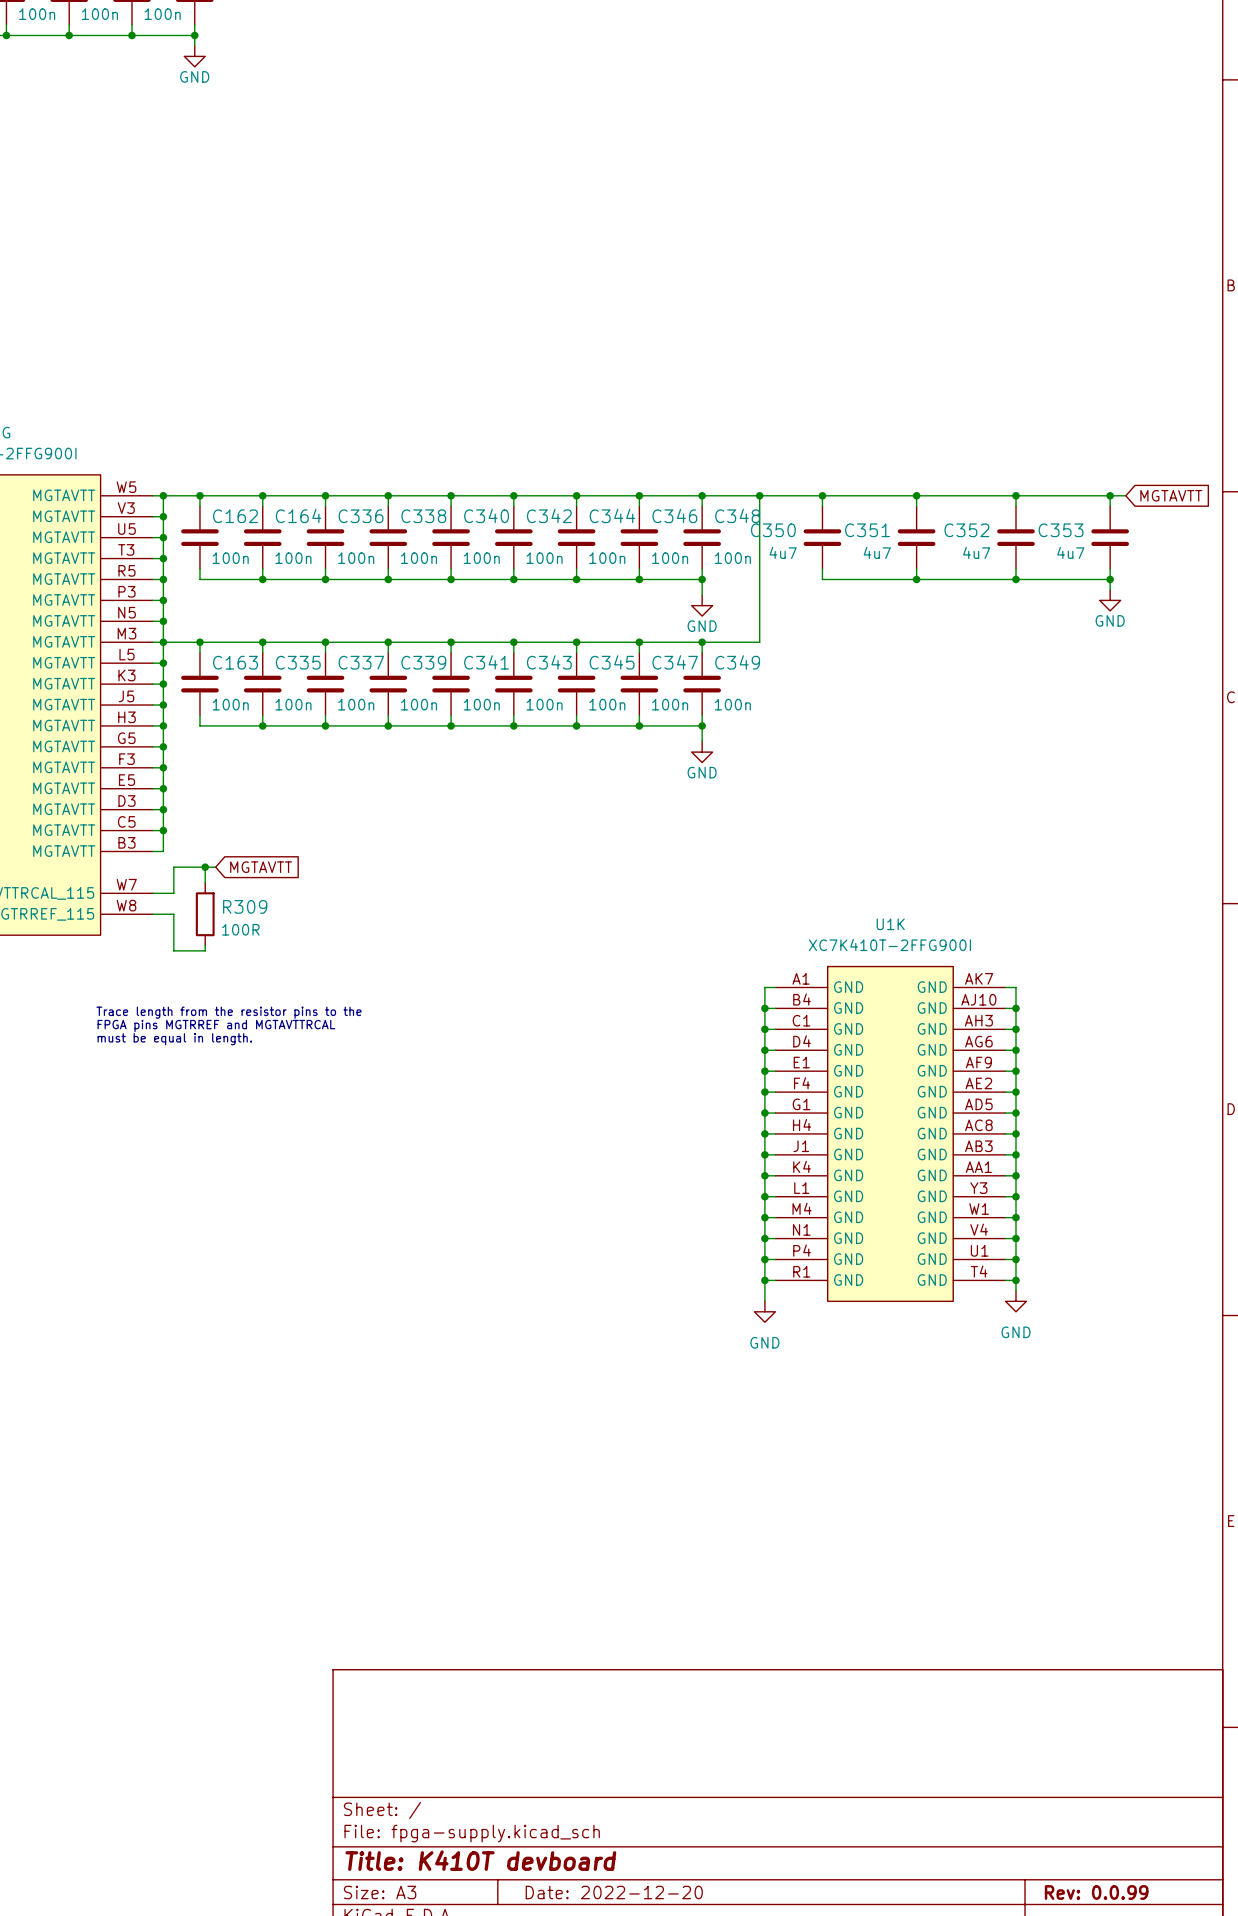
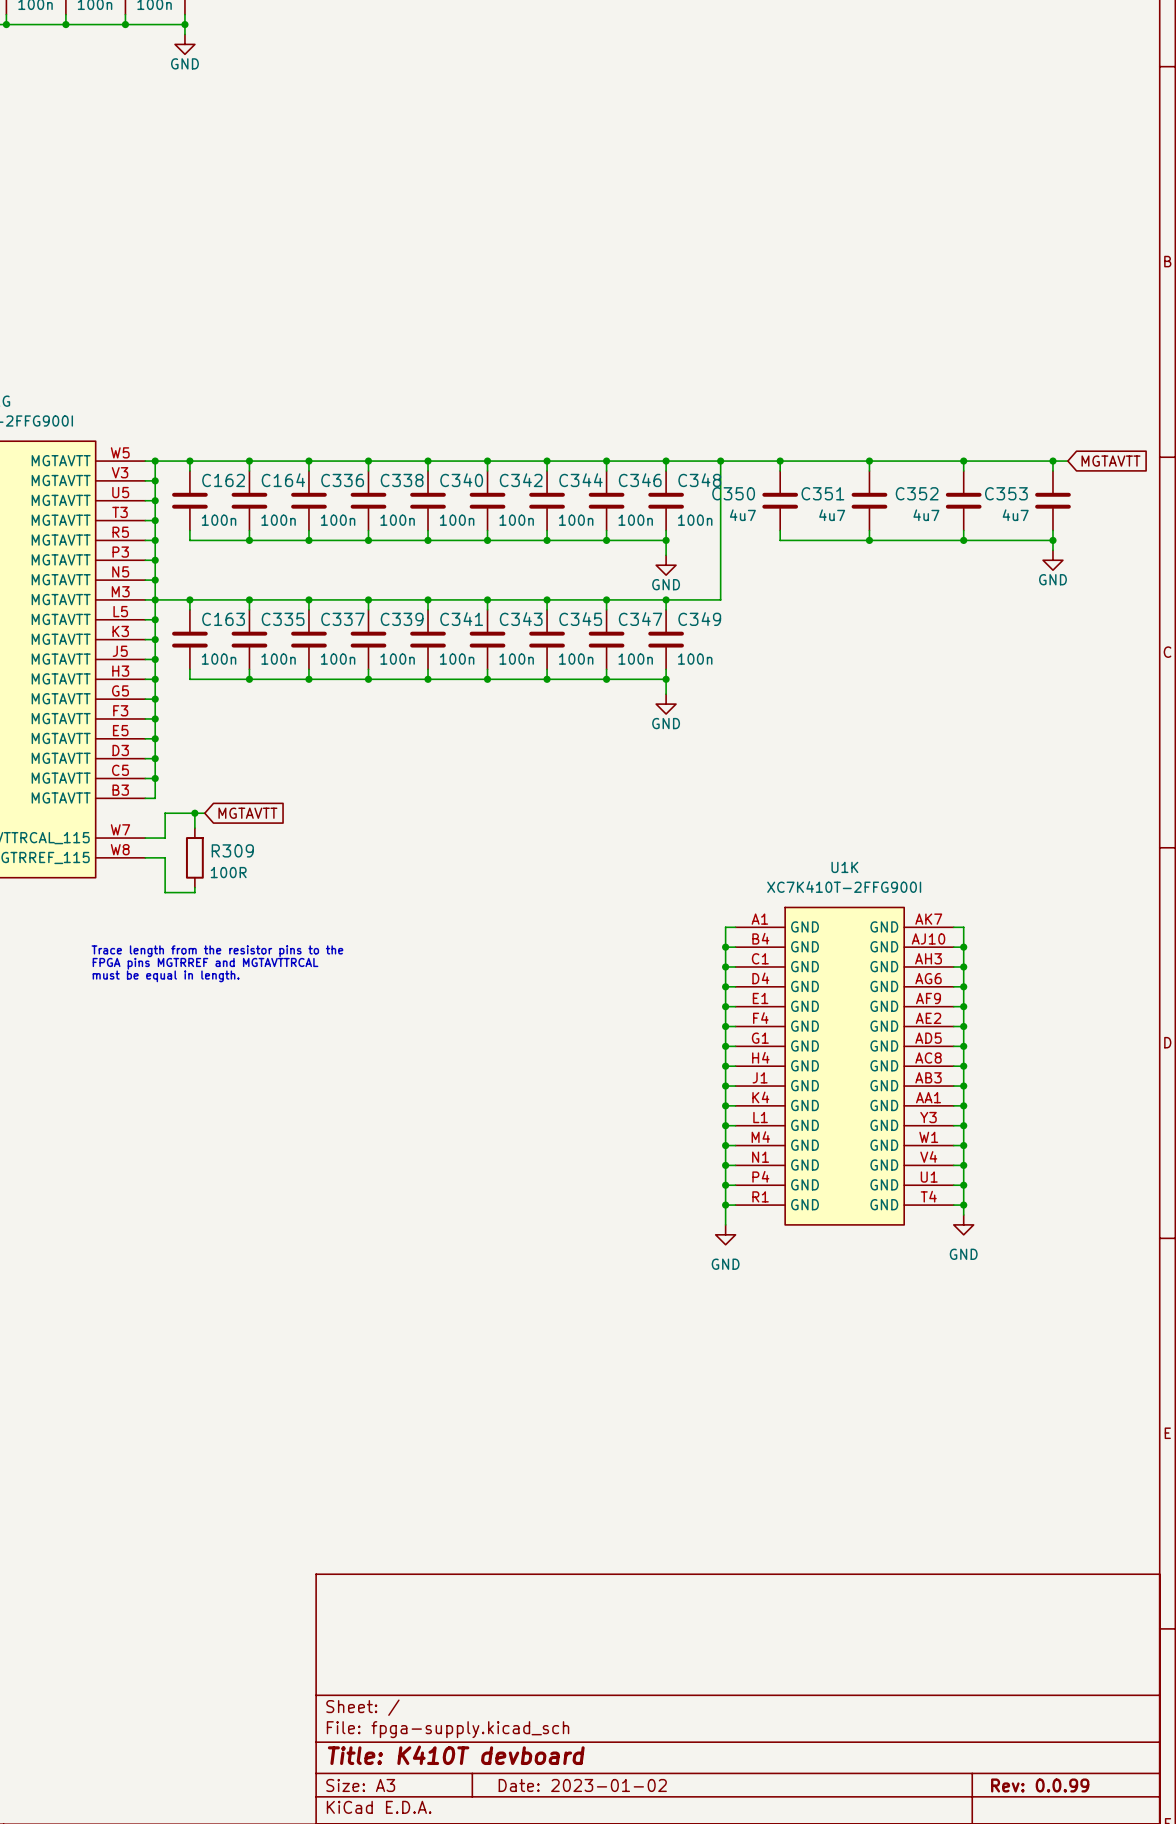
title block: Date: 2022-12-20 (614, 1892) -> Date: 2023-01-02 (582, 1785)

